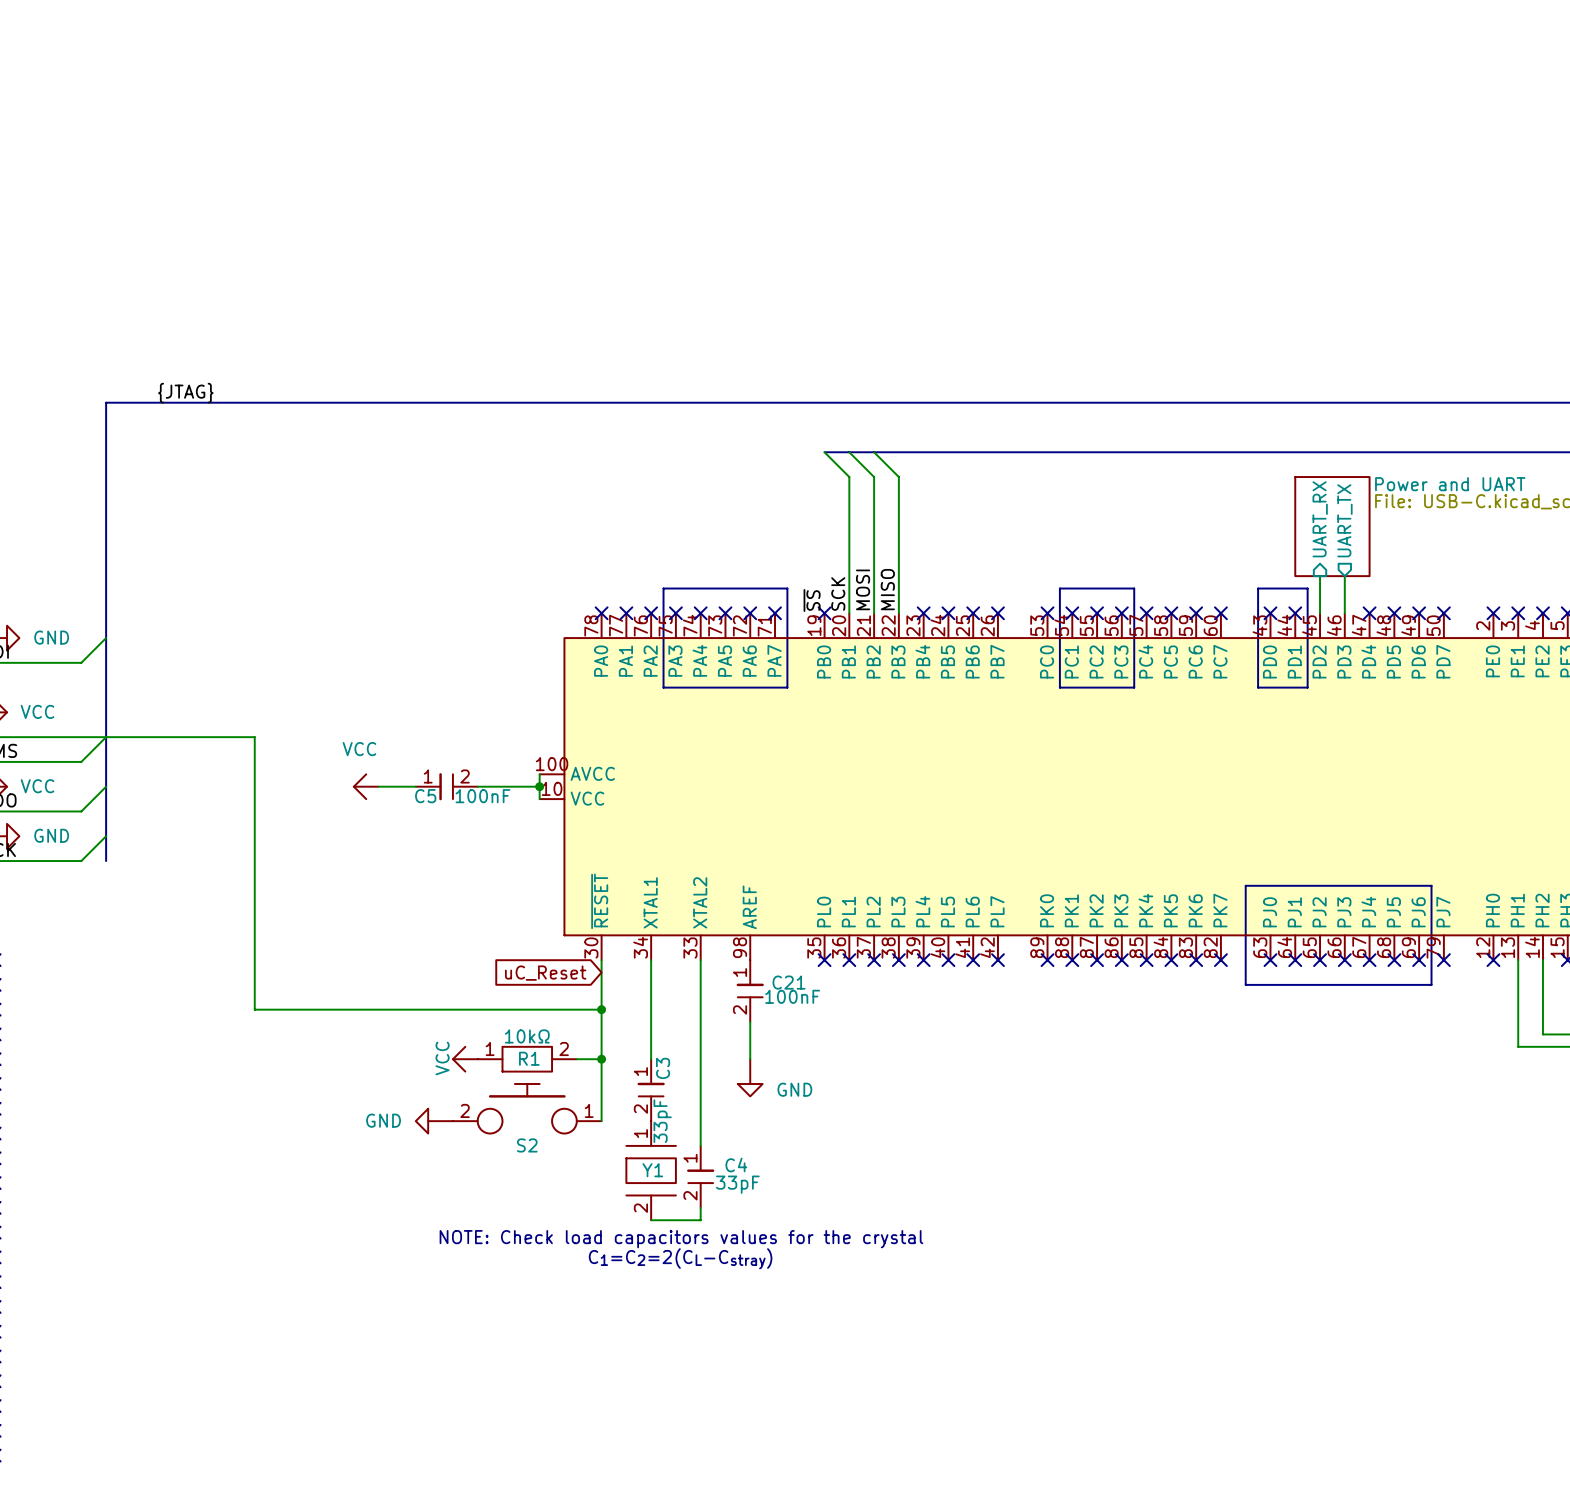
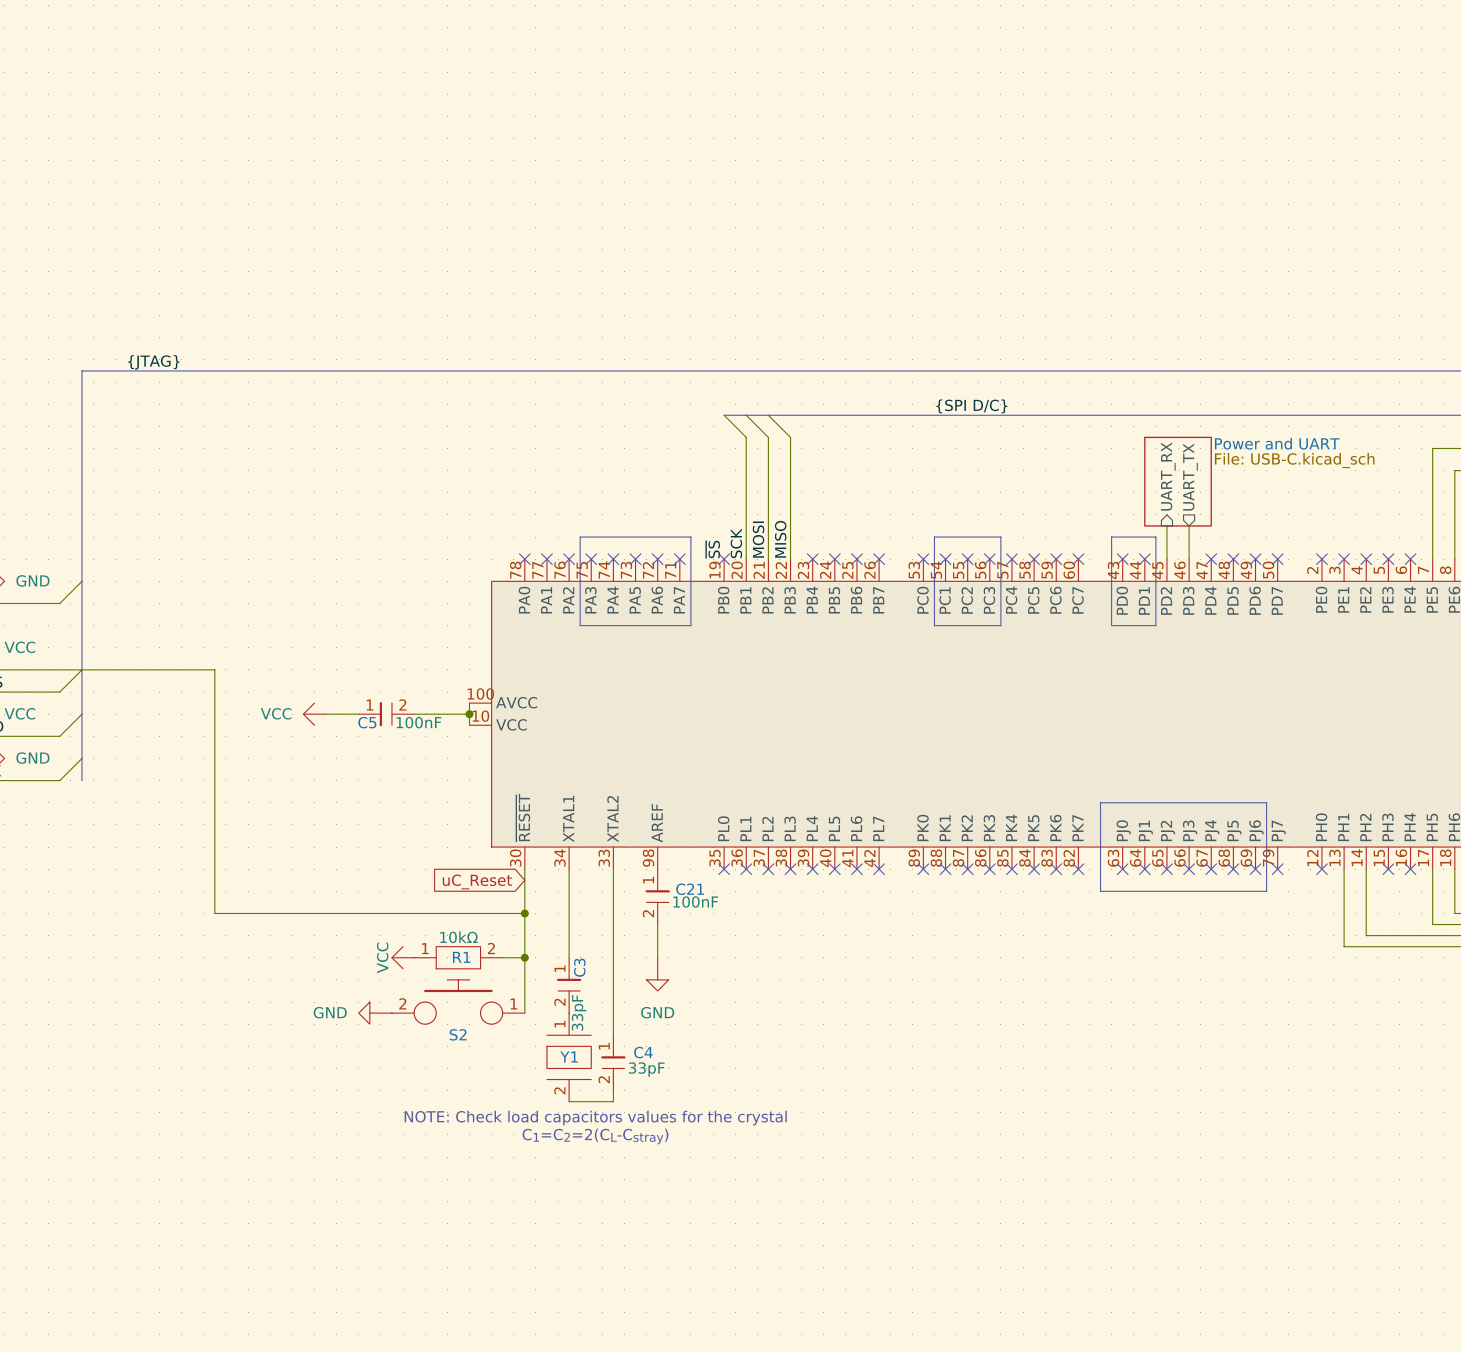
label: none -> {SPI D/C} (971, 406)
power symbol text position: VCC (359, 749) -> VCC (276, 713)
power symbol text position: GND (794, 1089) -> GND (657, 1012)

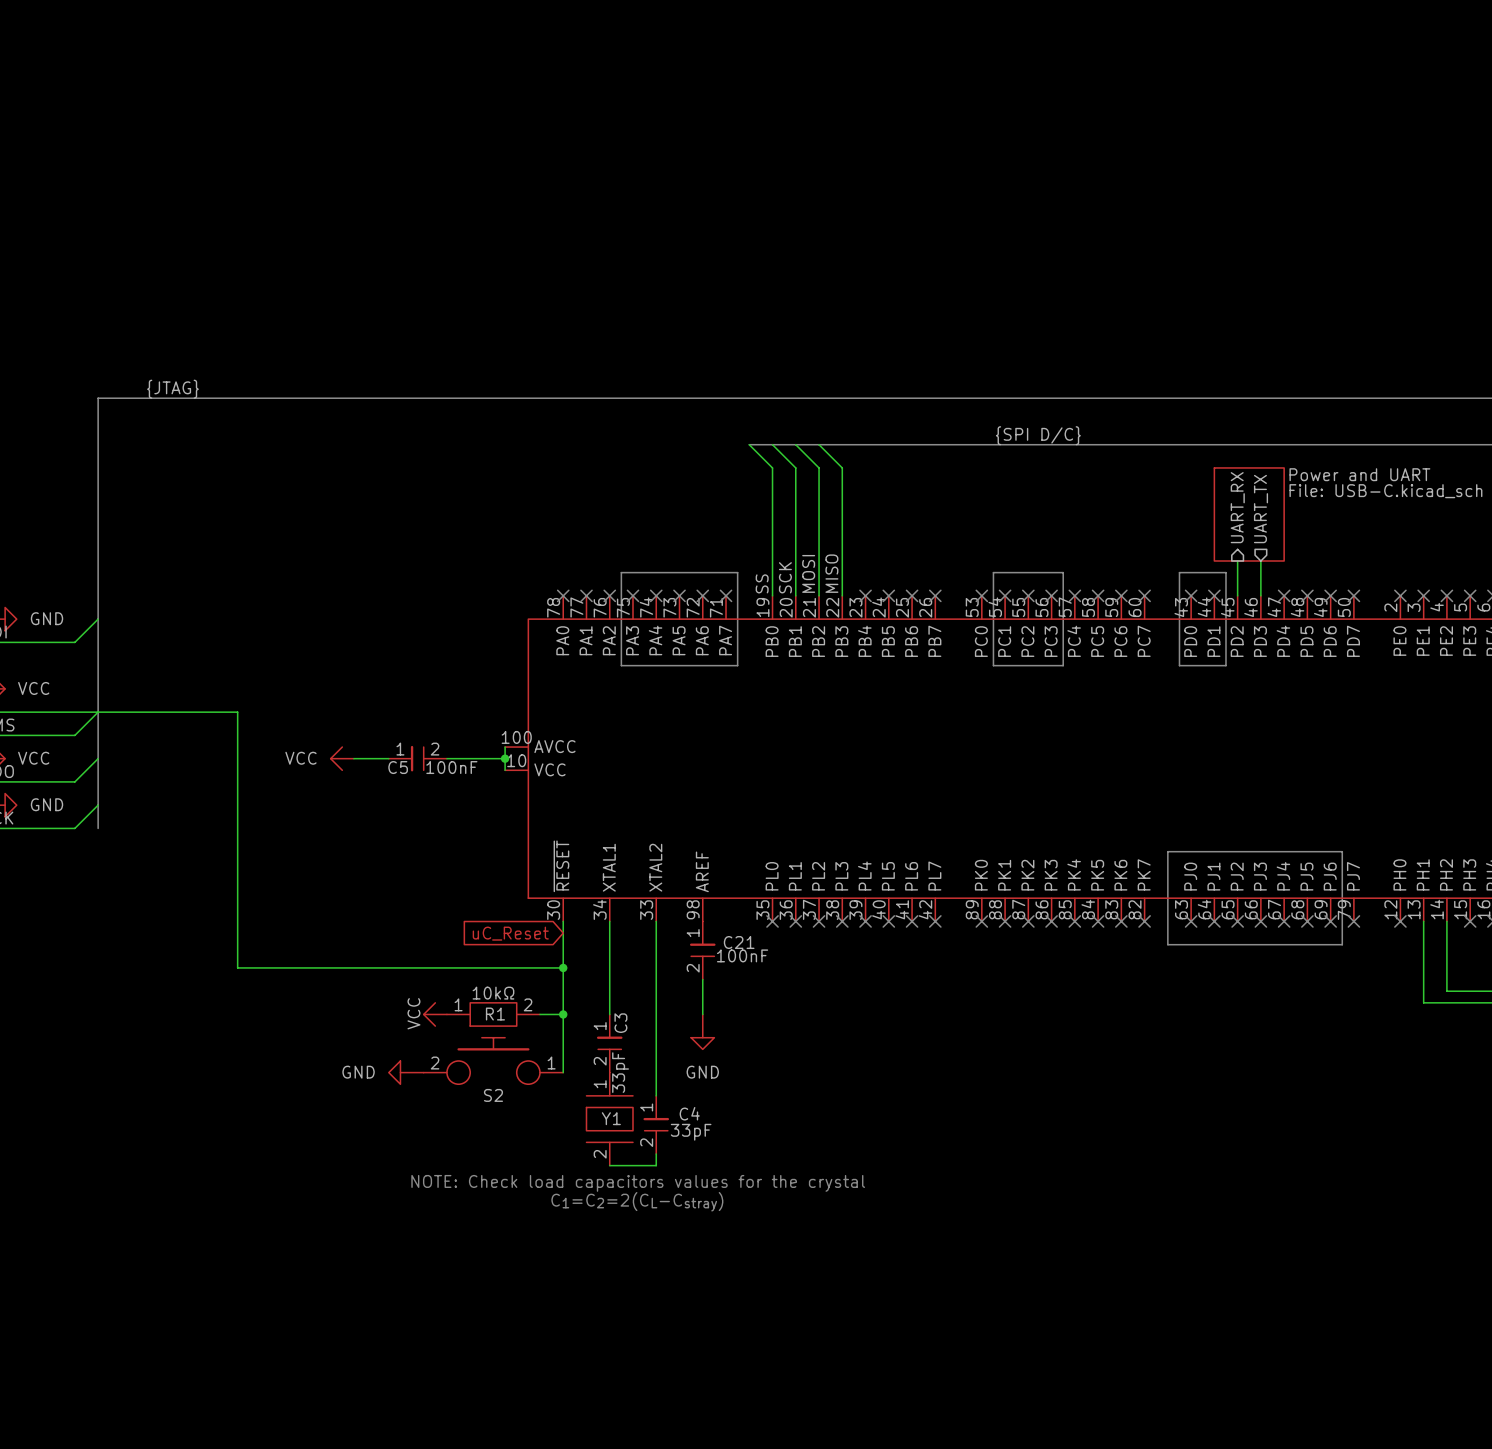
wire: none -> (749, 444) (772, 467) (772, 595)
bus: none -> (749, 444) (772, 444)
label: ~{SS} (713, 549) -> SS (762, 583)
no-connect mark: (724, 559) -> none

